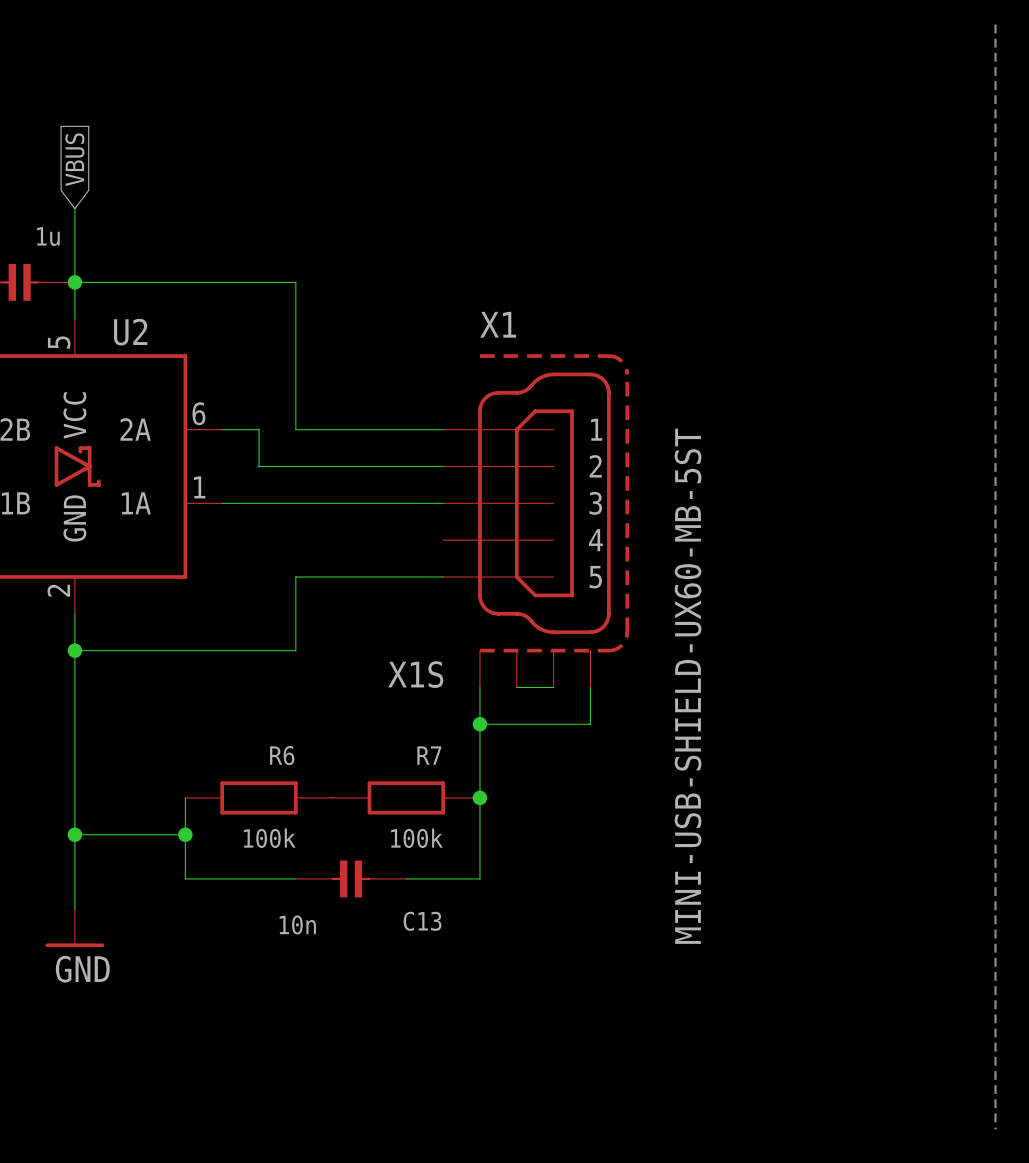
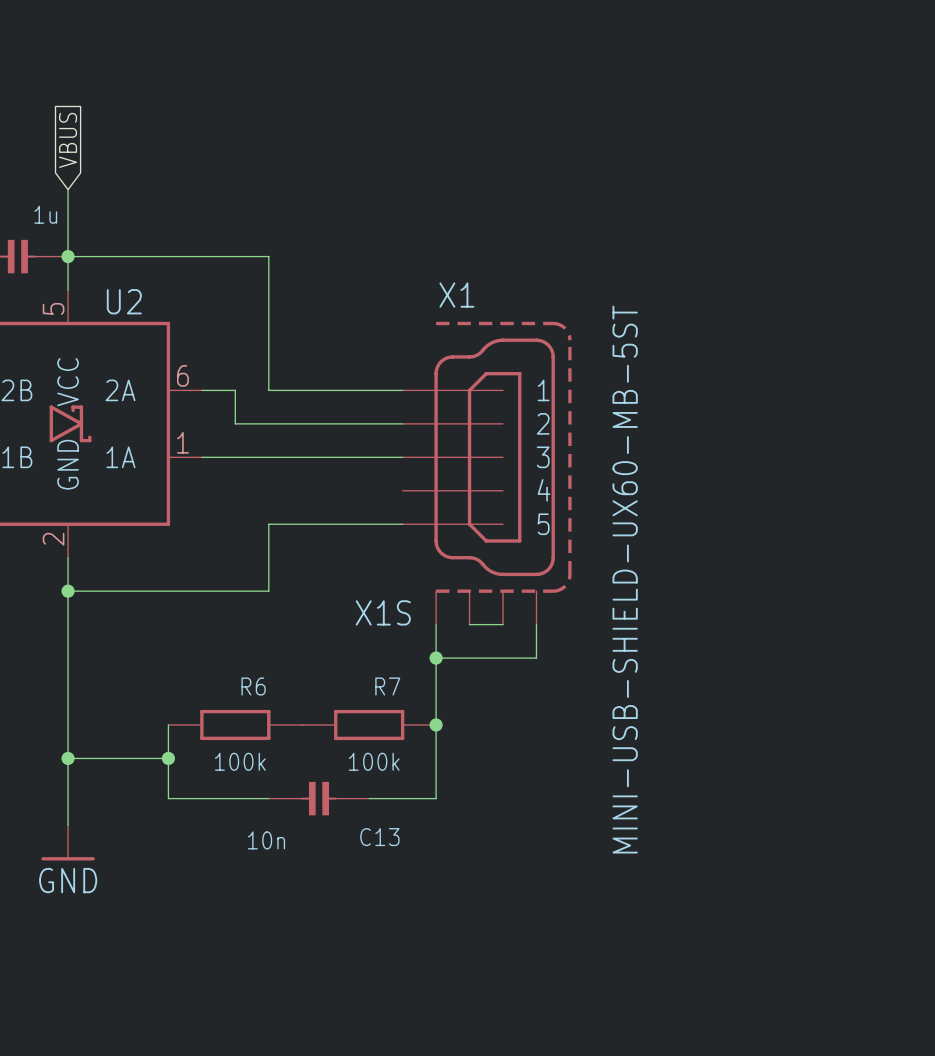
line: (995, 24) (995, 1129) -> none

